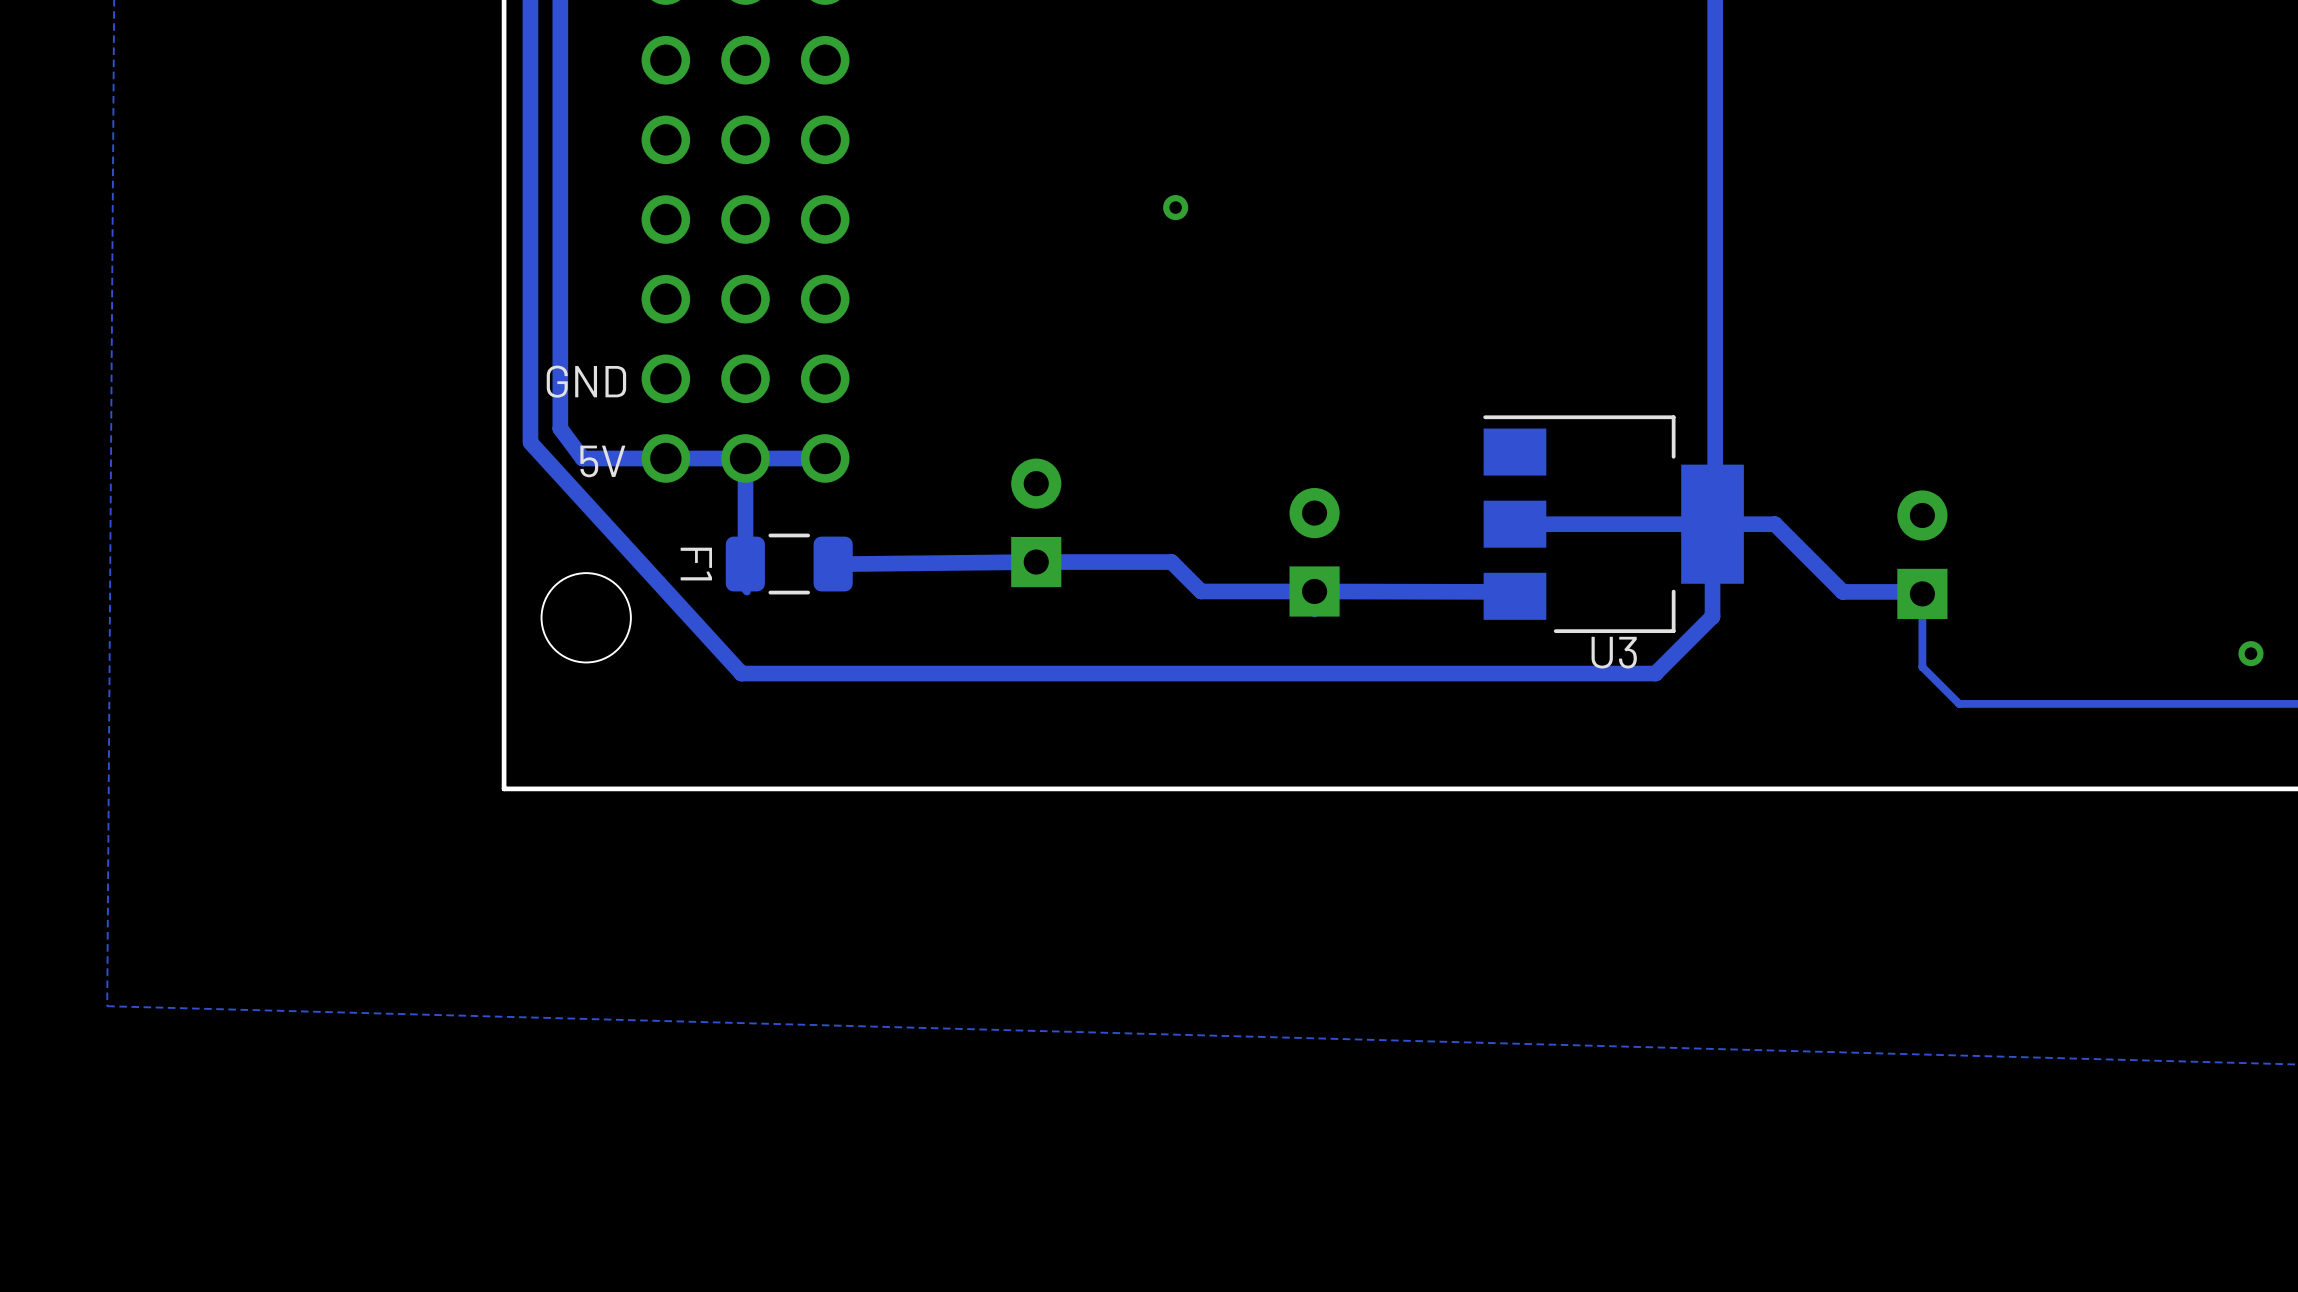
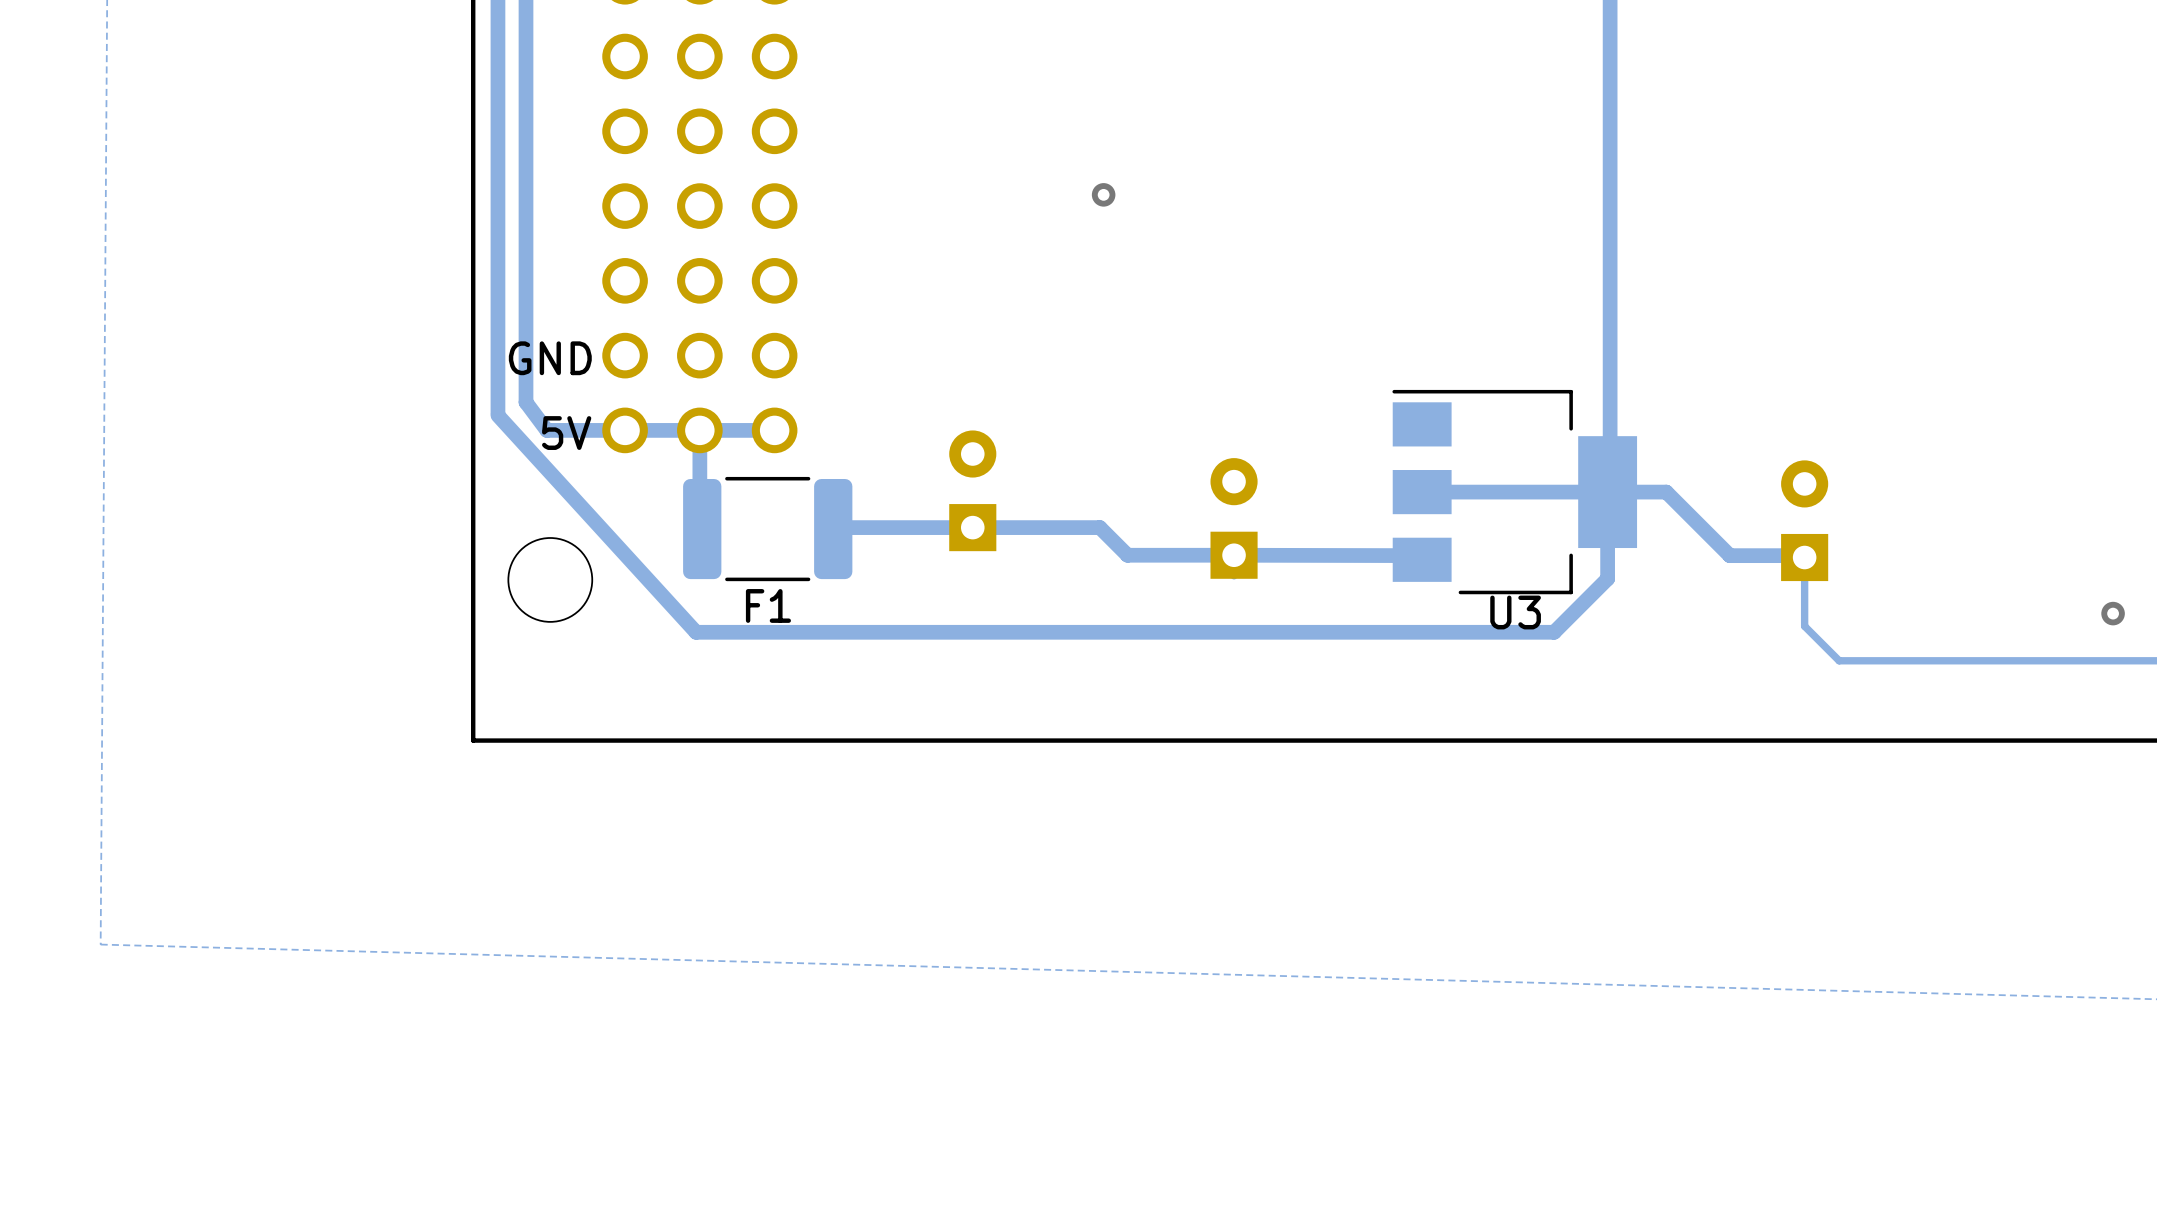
F1 footprint: [725, 533, 853, 595] -> [683, 476, 853, 582]
track: (1036, 562) (850, 564) -> (972, 527) (833, 529)
F1 name position: F1 (696, 564) -> F1 (768, 605)

